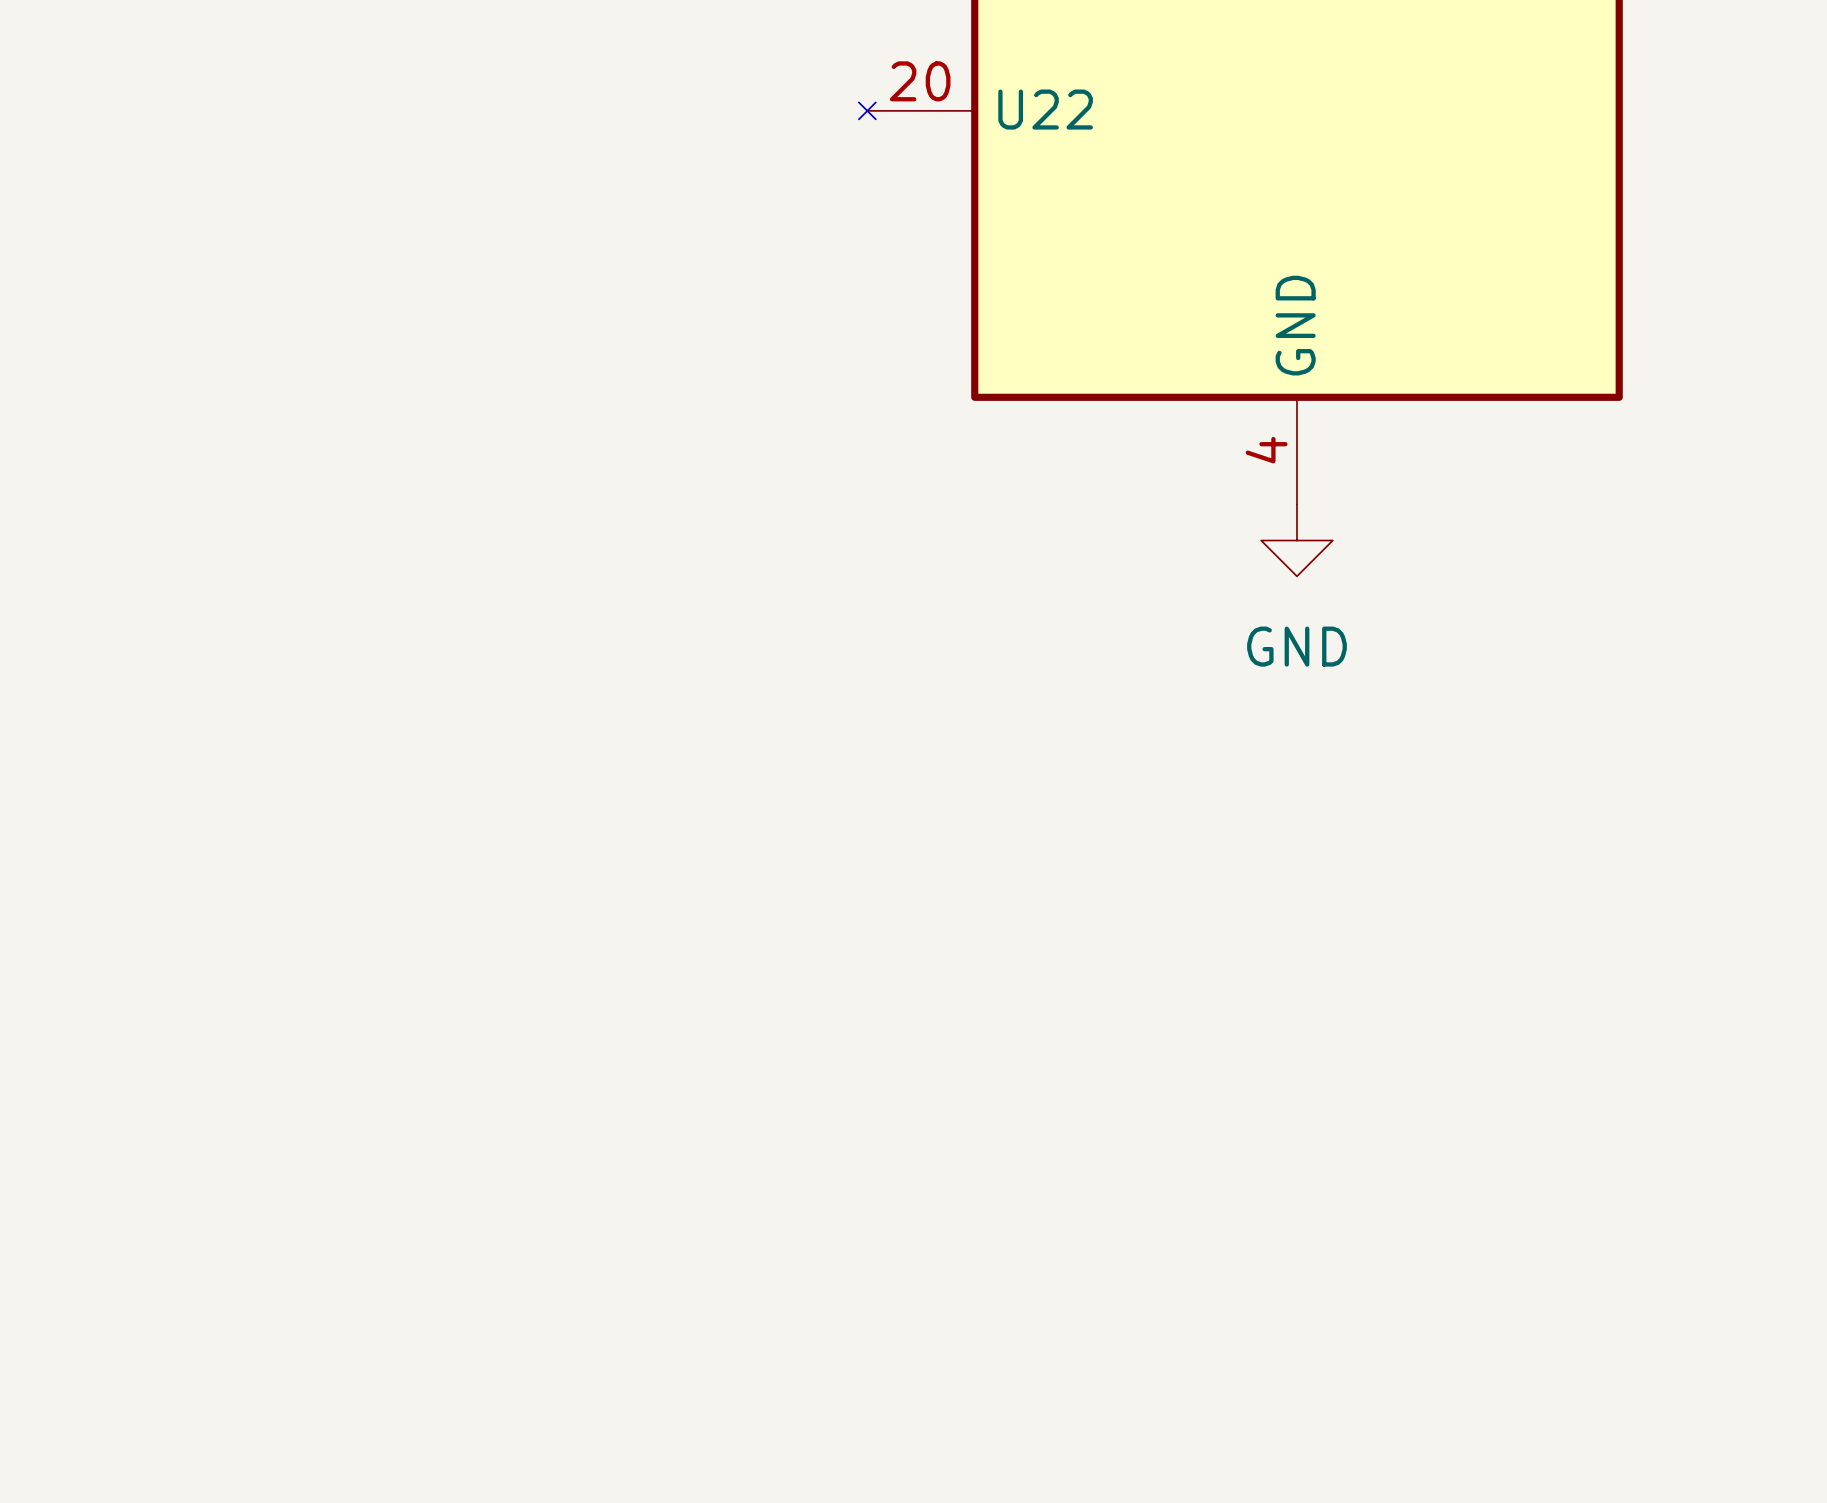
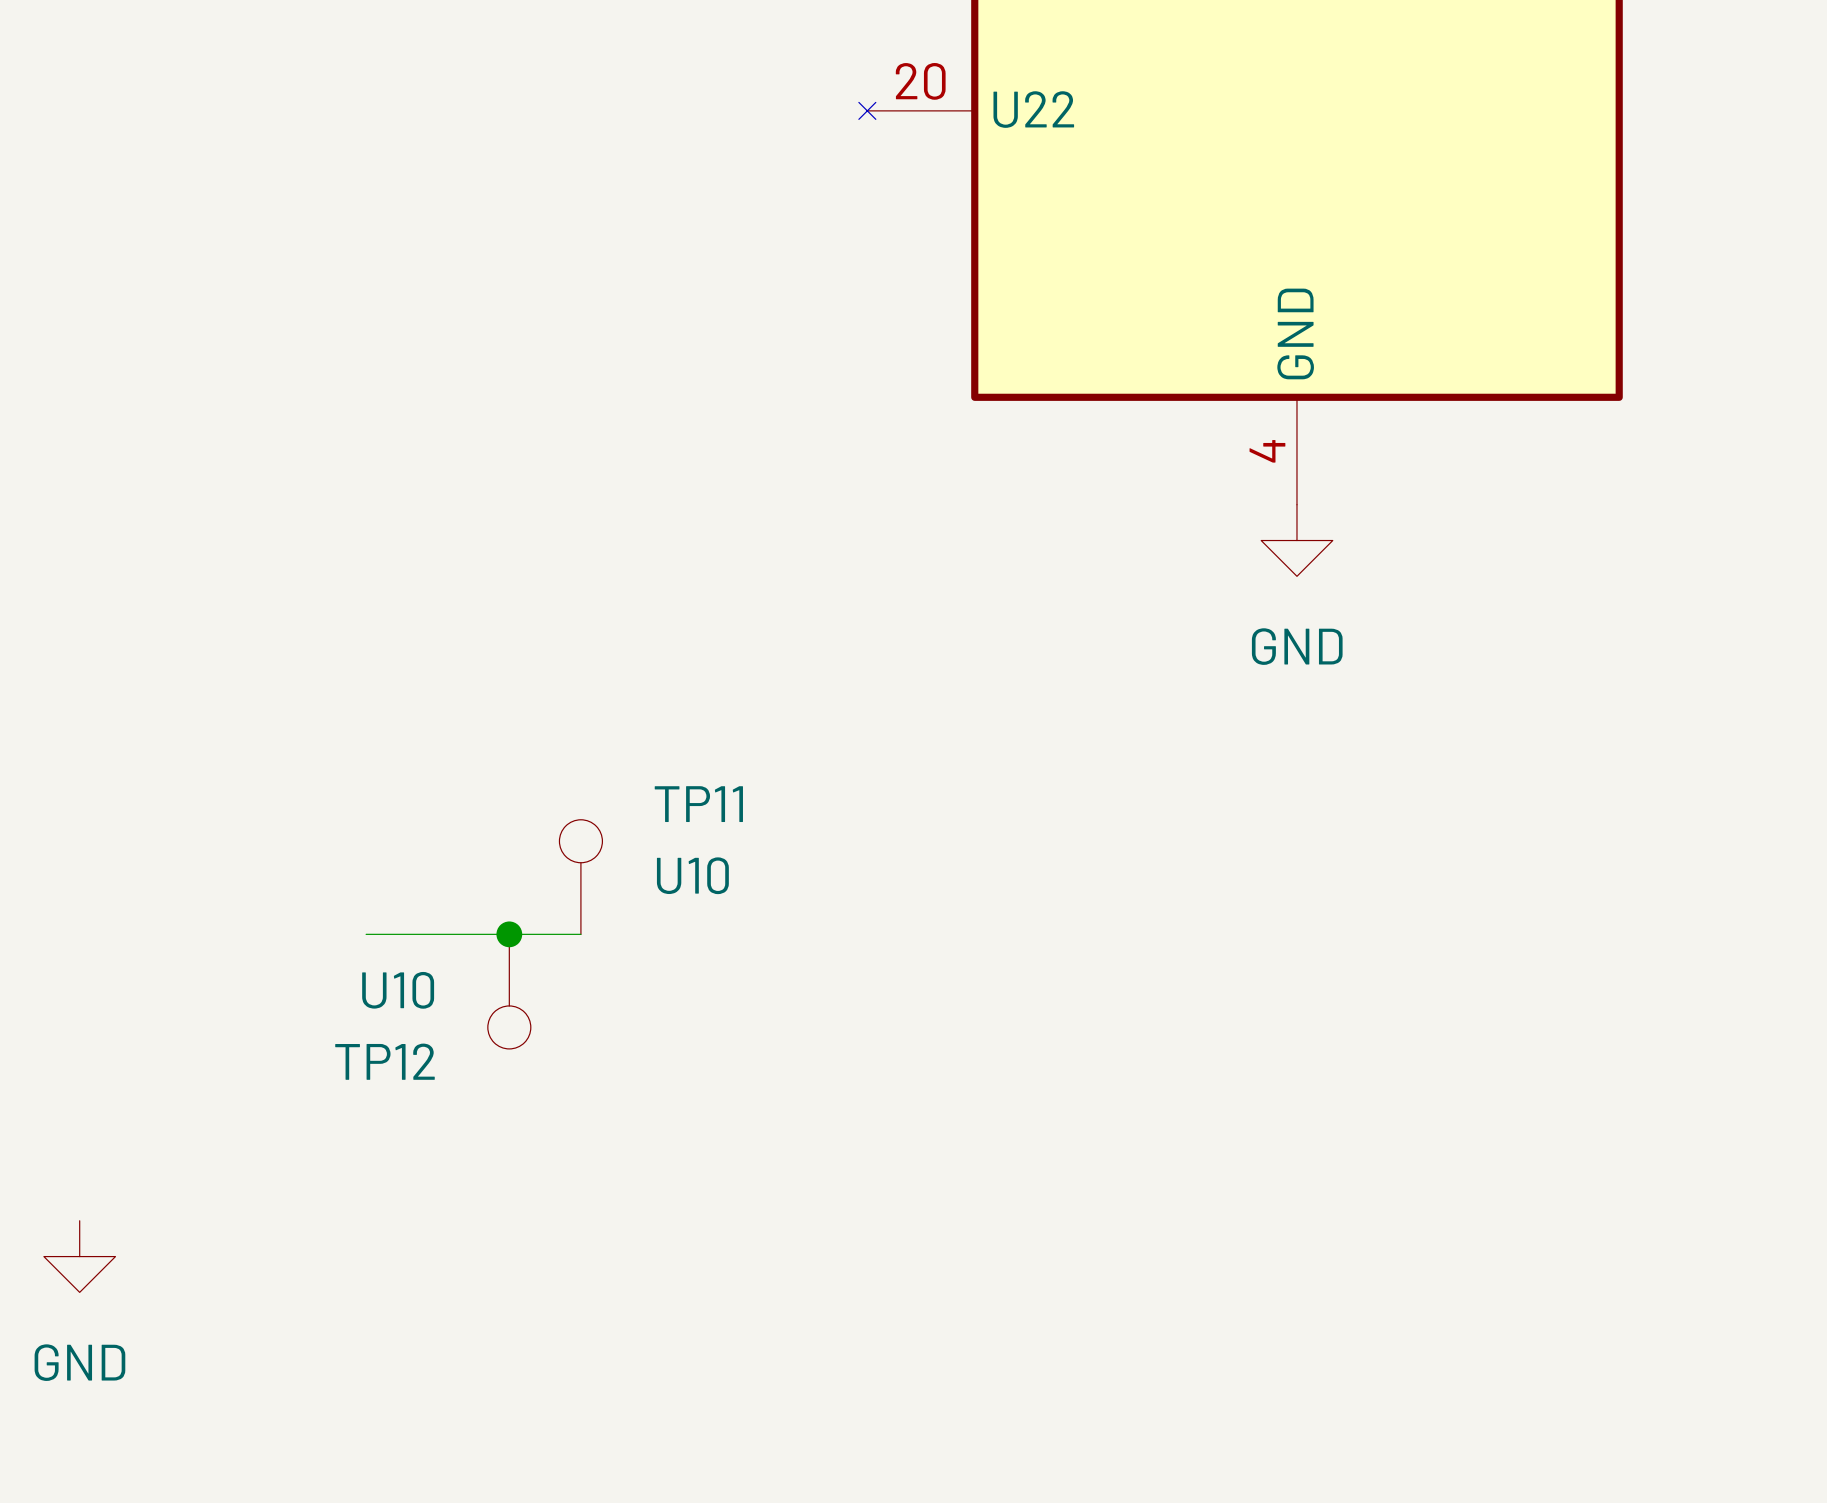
TP11: none -> U10 (580, 877)
wire: none -> (366, 934) (580, 934)
junction: none -> (509, 934)
TP12: none -> U10 (509, 991)
power symbol: none -> GND (79, 1256)

